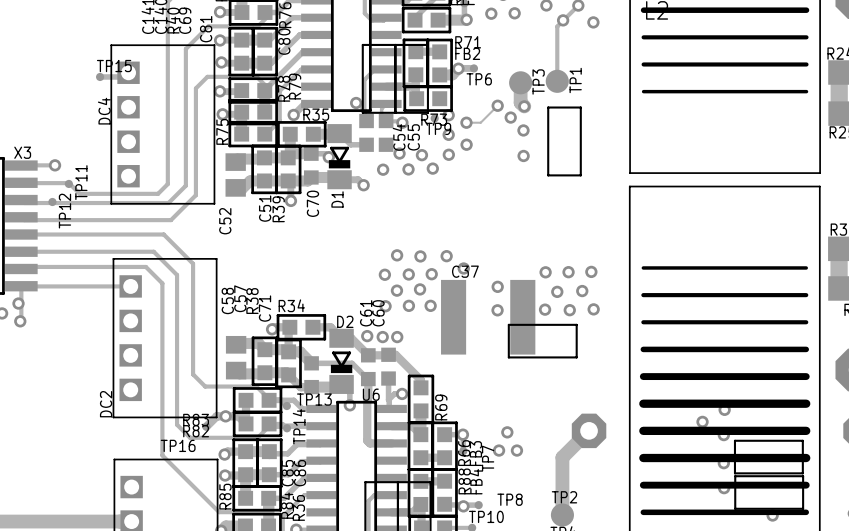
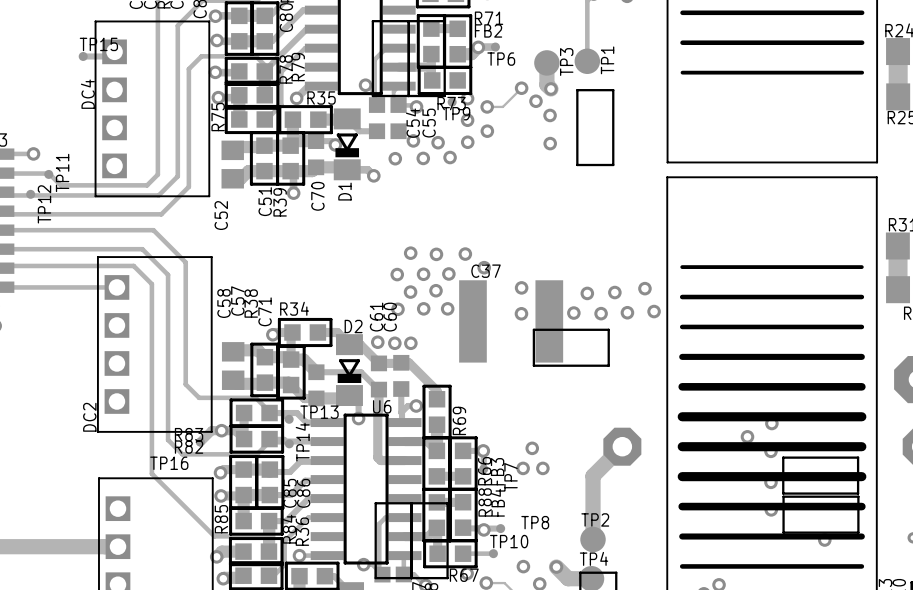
via: (591, 271) -> none
via: (545, 272) -> none
via: (568, 272) -> none
via: none -> (644, 288)
via: none -> (654, 311)

